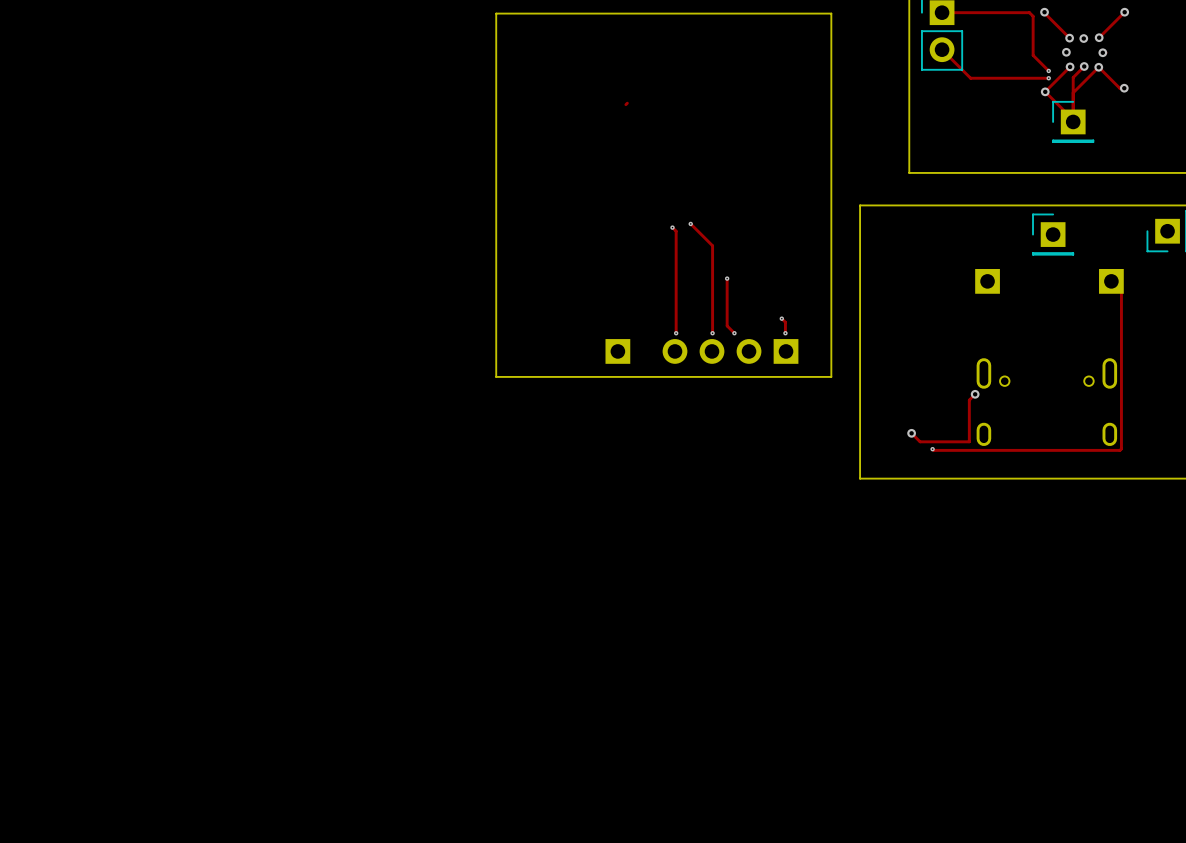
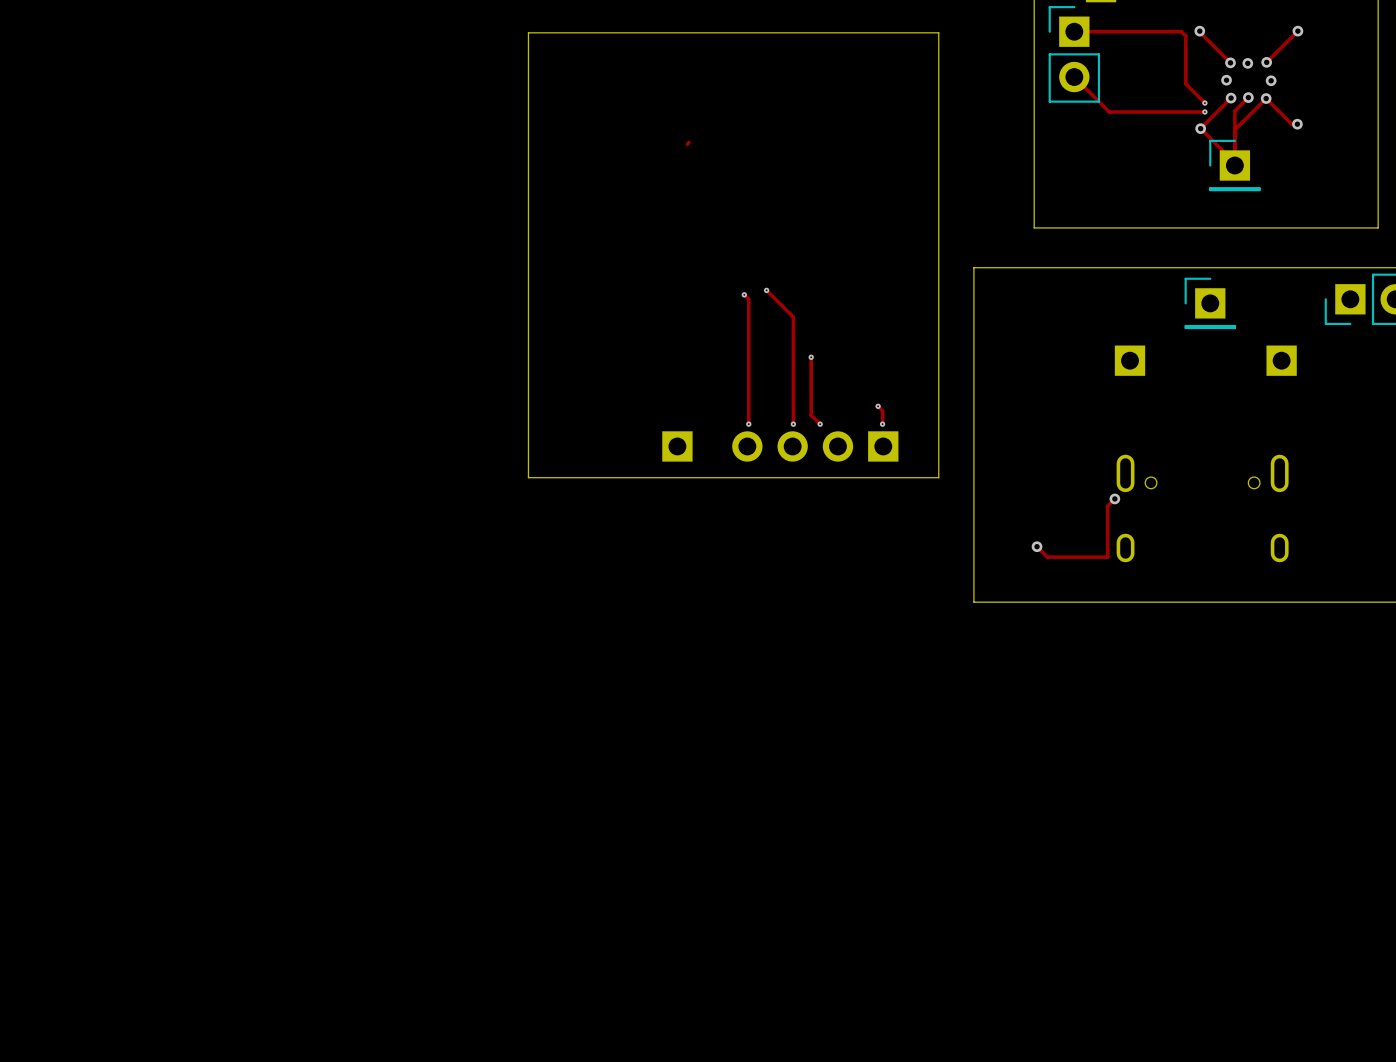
track: (1111, 281) (1121, 291) (1119, 450) (932, 449) -> none
via: (932, 449) -> none

